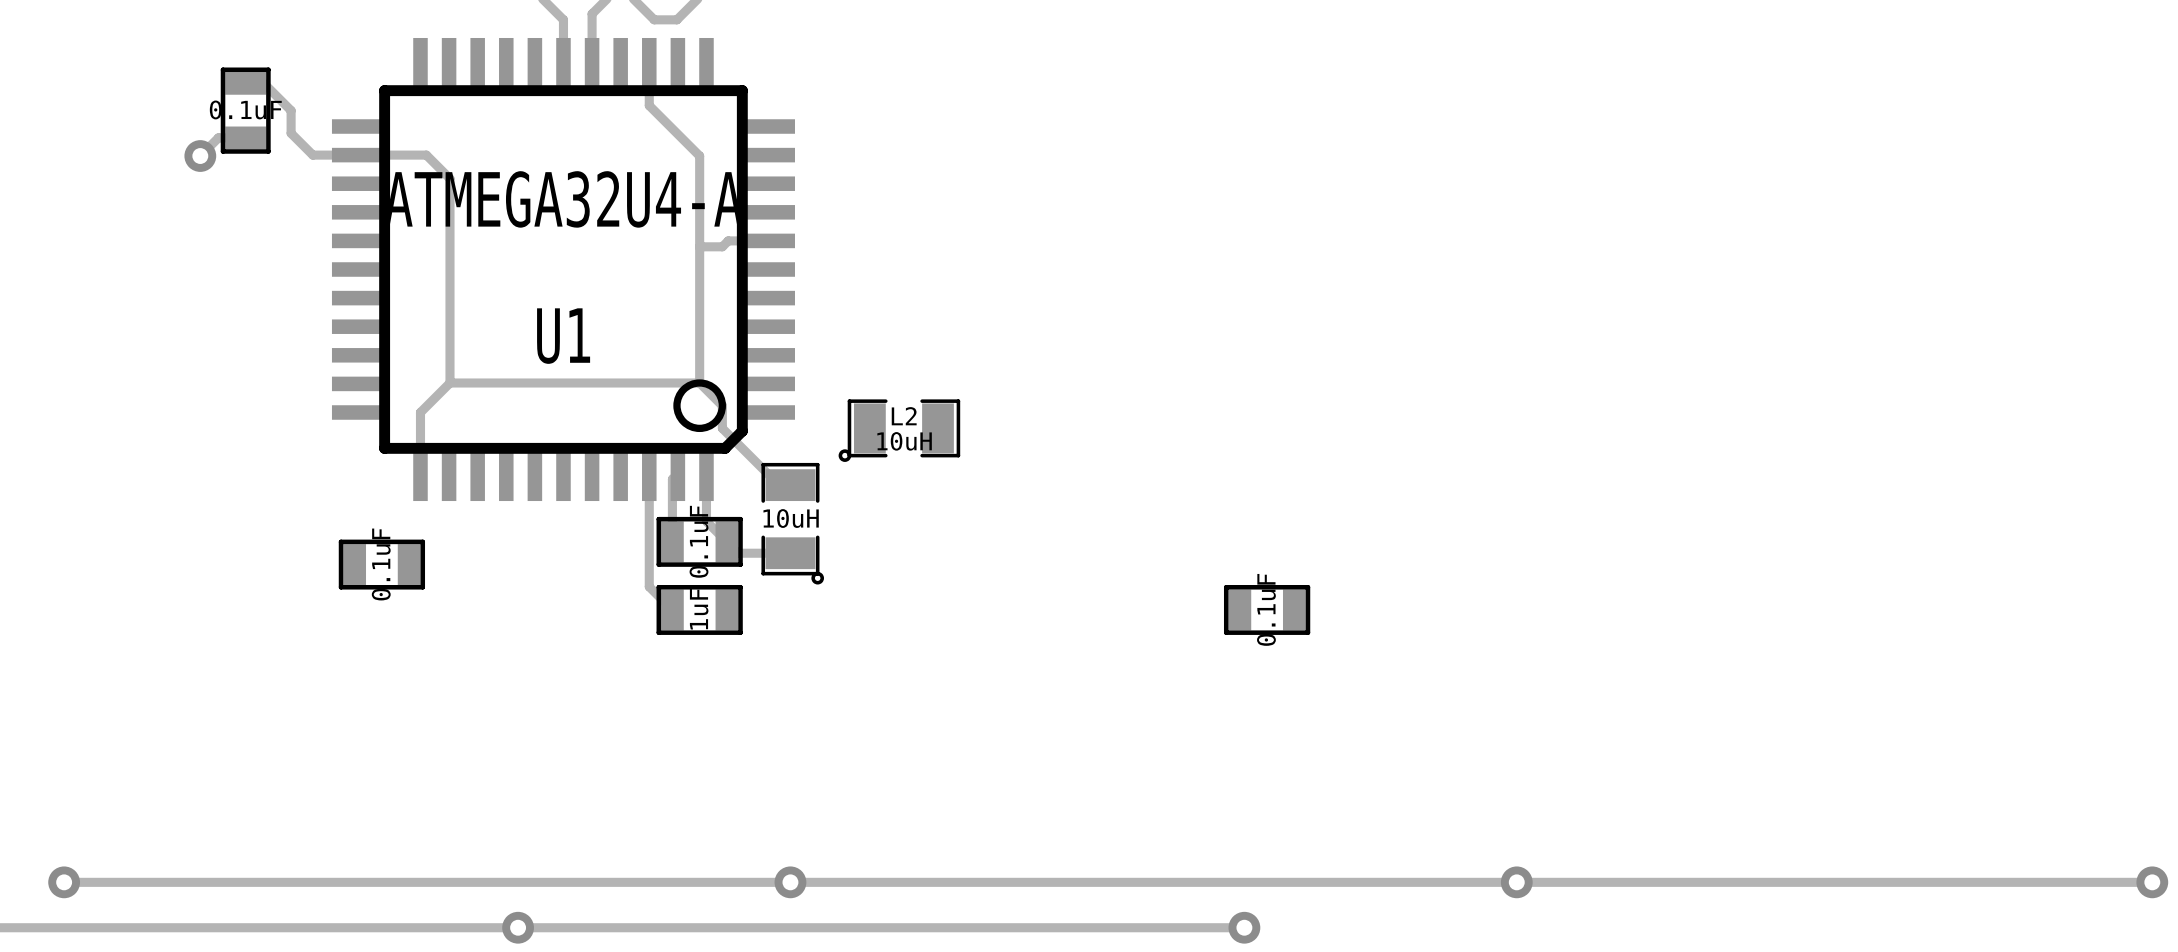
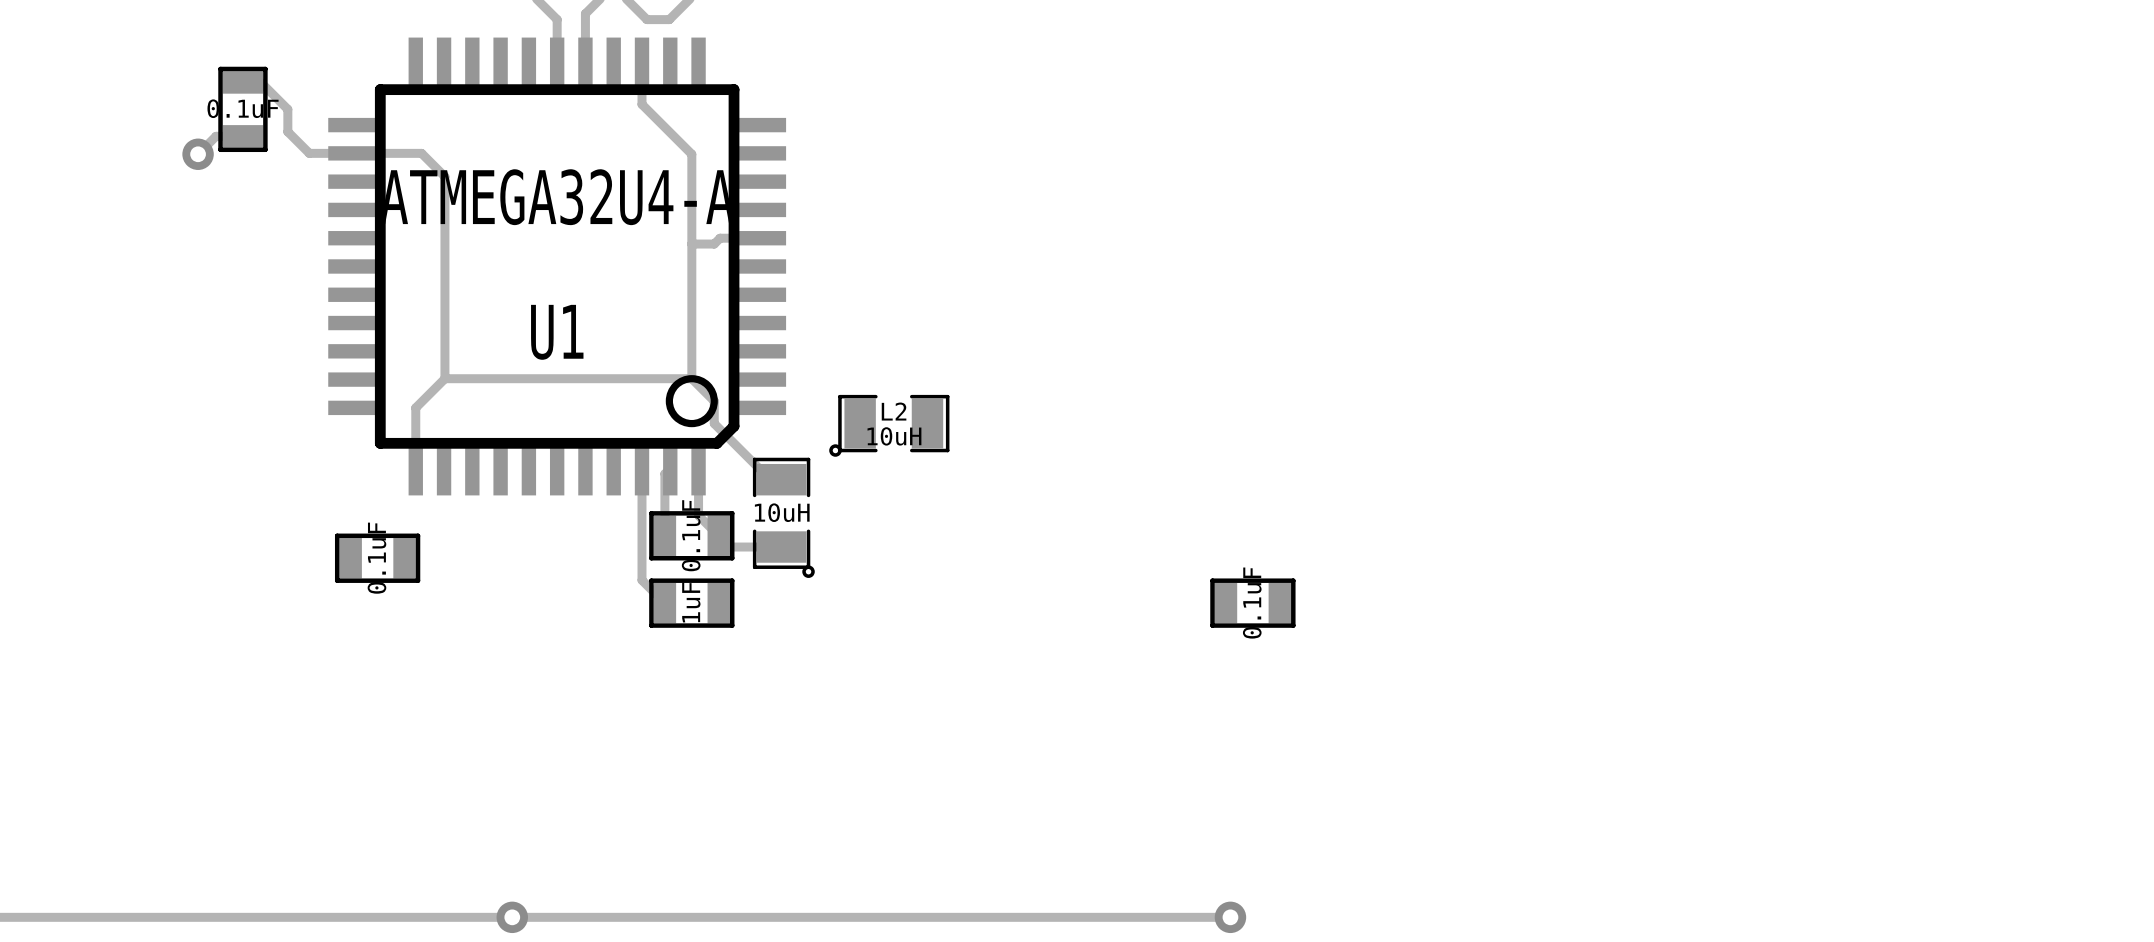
track: (64, 882) (2152, 882) -> none
via: (64, 882) -> none
via: (790, 882) -> none
via: (1516, 882) -> none
via: (2152, 882) -> none

